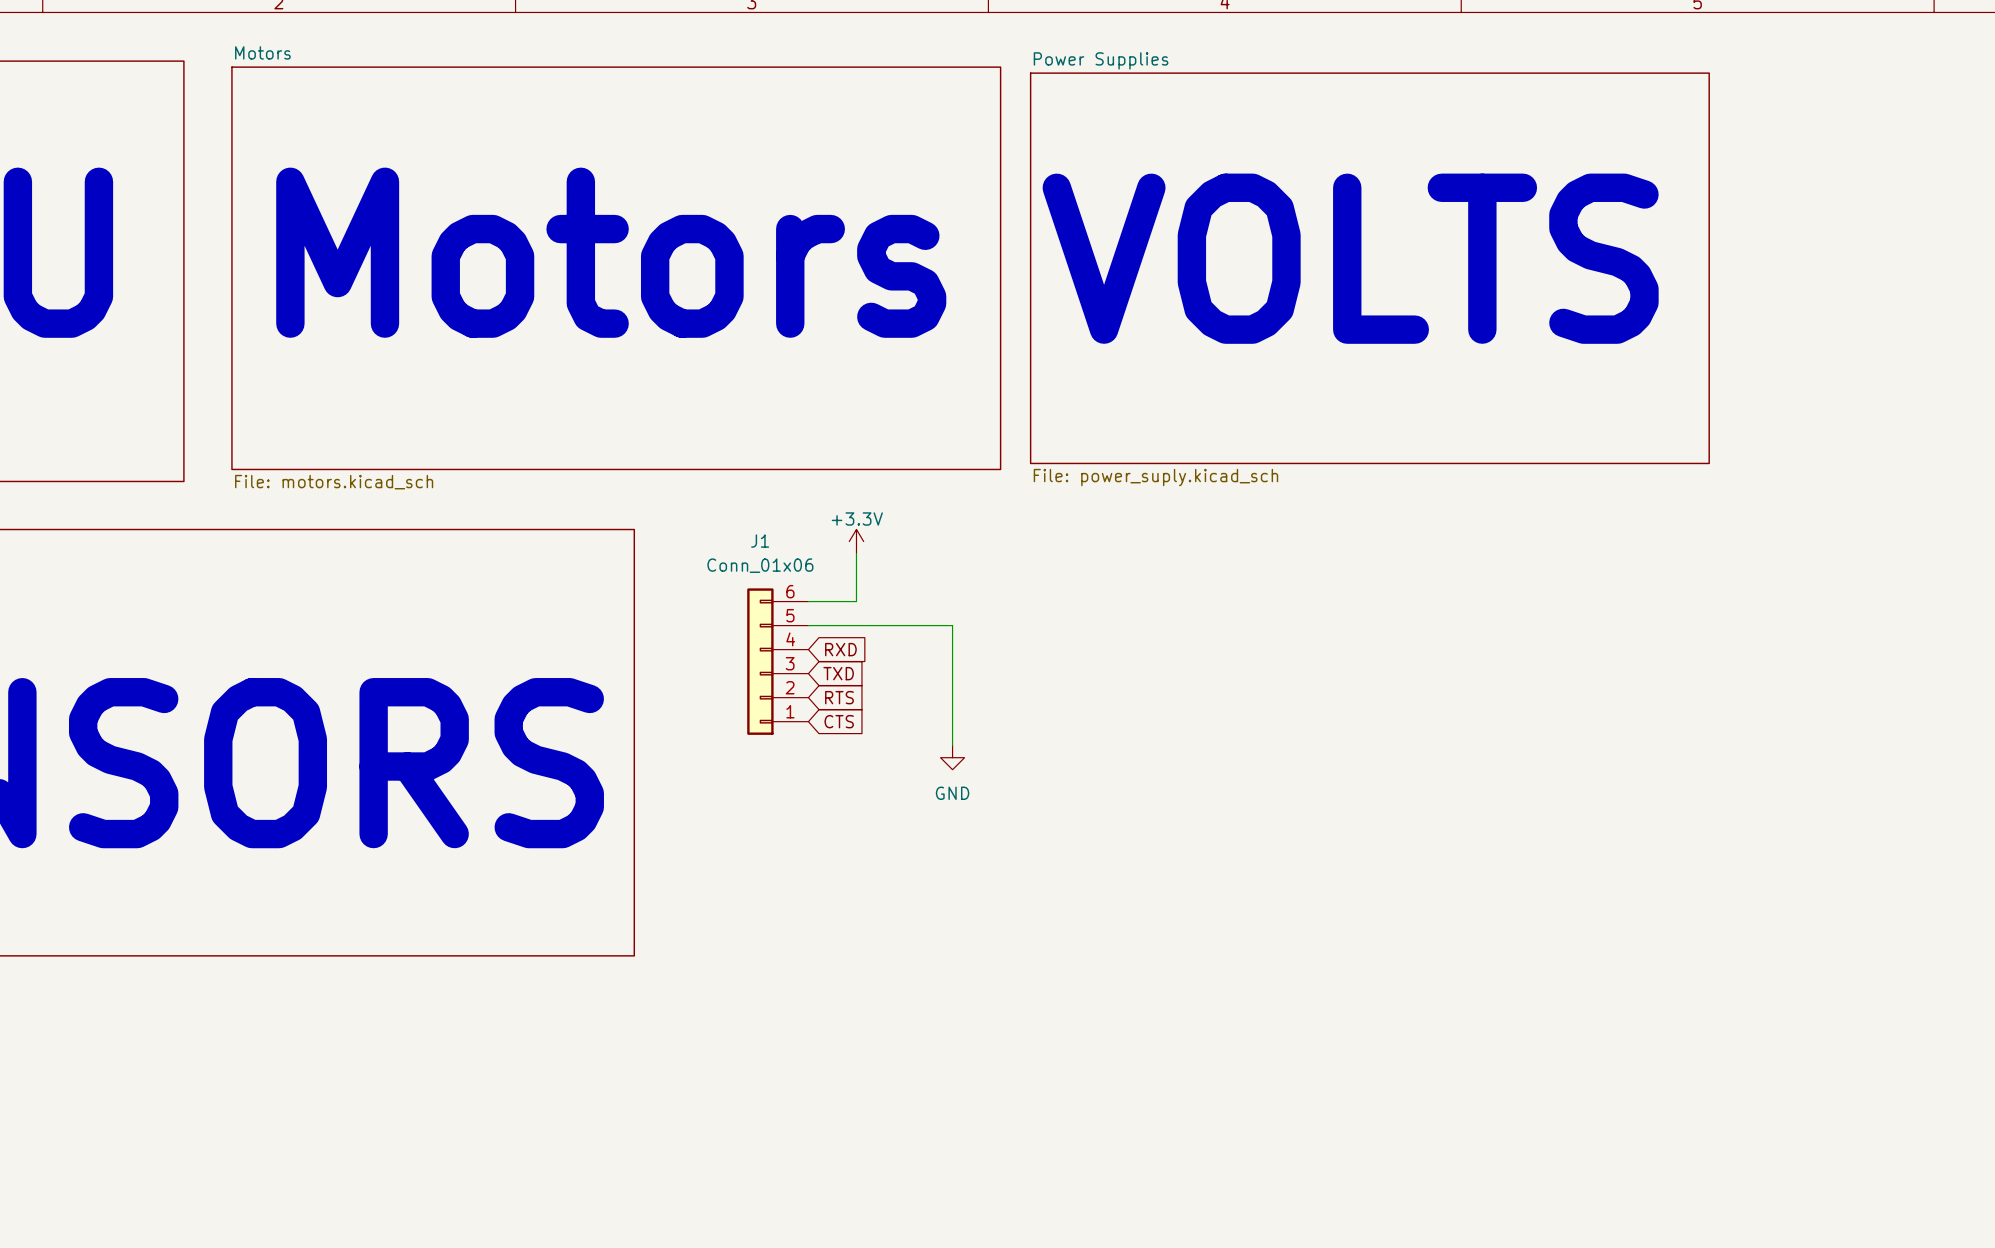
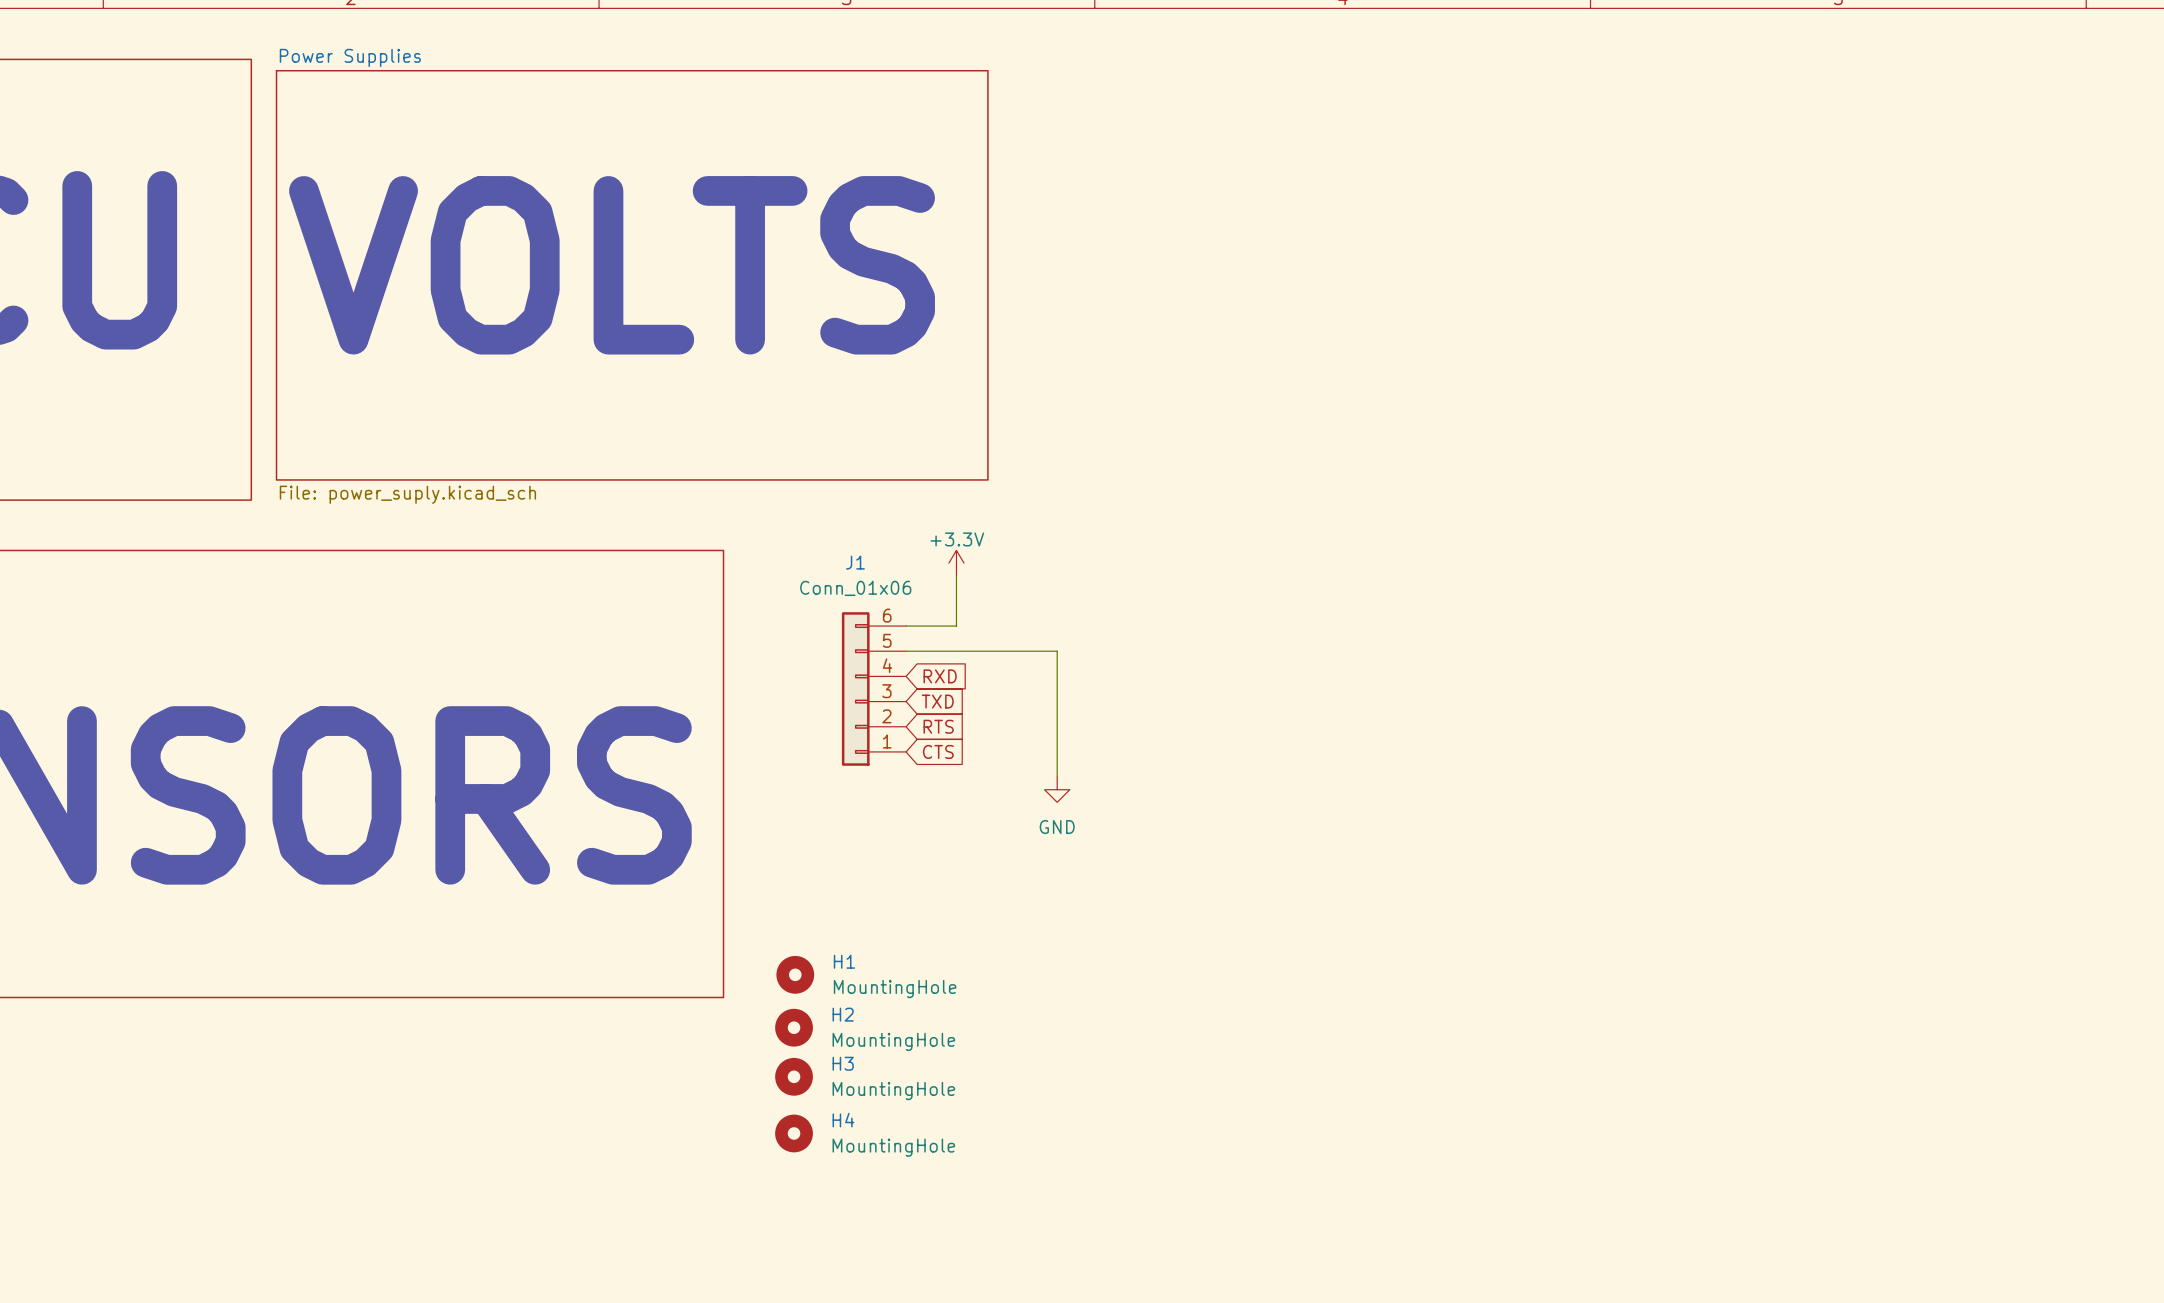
text: Motors (611, 252) -> none
text: none -> VOLTS (612, 265)
text: VOLTS (1350, 258) -> none
sheet Power Supplies: none -> File: power_suply.kicad_sch (632, 275)
sheet Motors: File: motors.kicad_sch (616, 268) -> none
sheet Power Supplies: File: power_suply.kicad_sch (1369, 268) -> none
H1: none -> MountingHole (795, 974)
H2: none -> MountingHole (794, 1027)
H3: none -> MountingHole (794, 1076)
H4: none -> MountingHole (794, 1133)

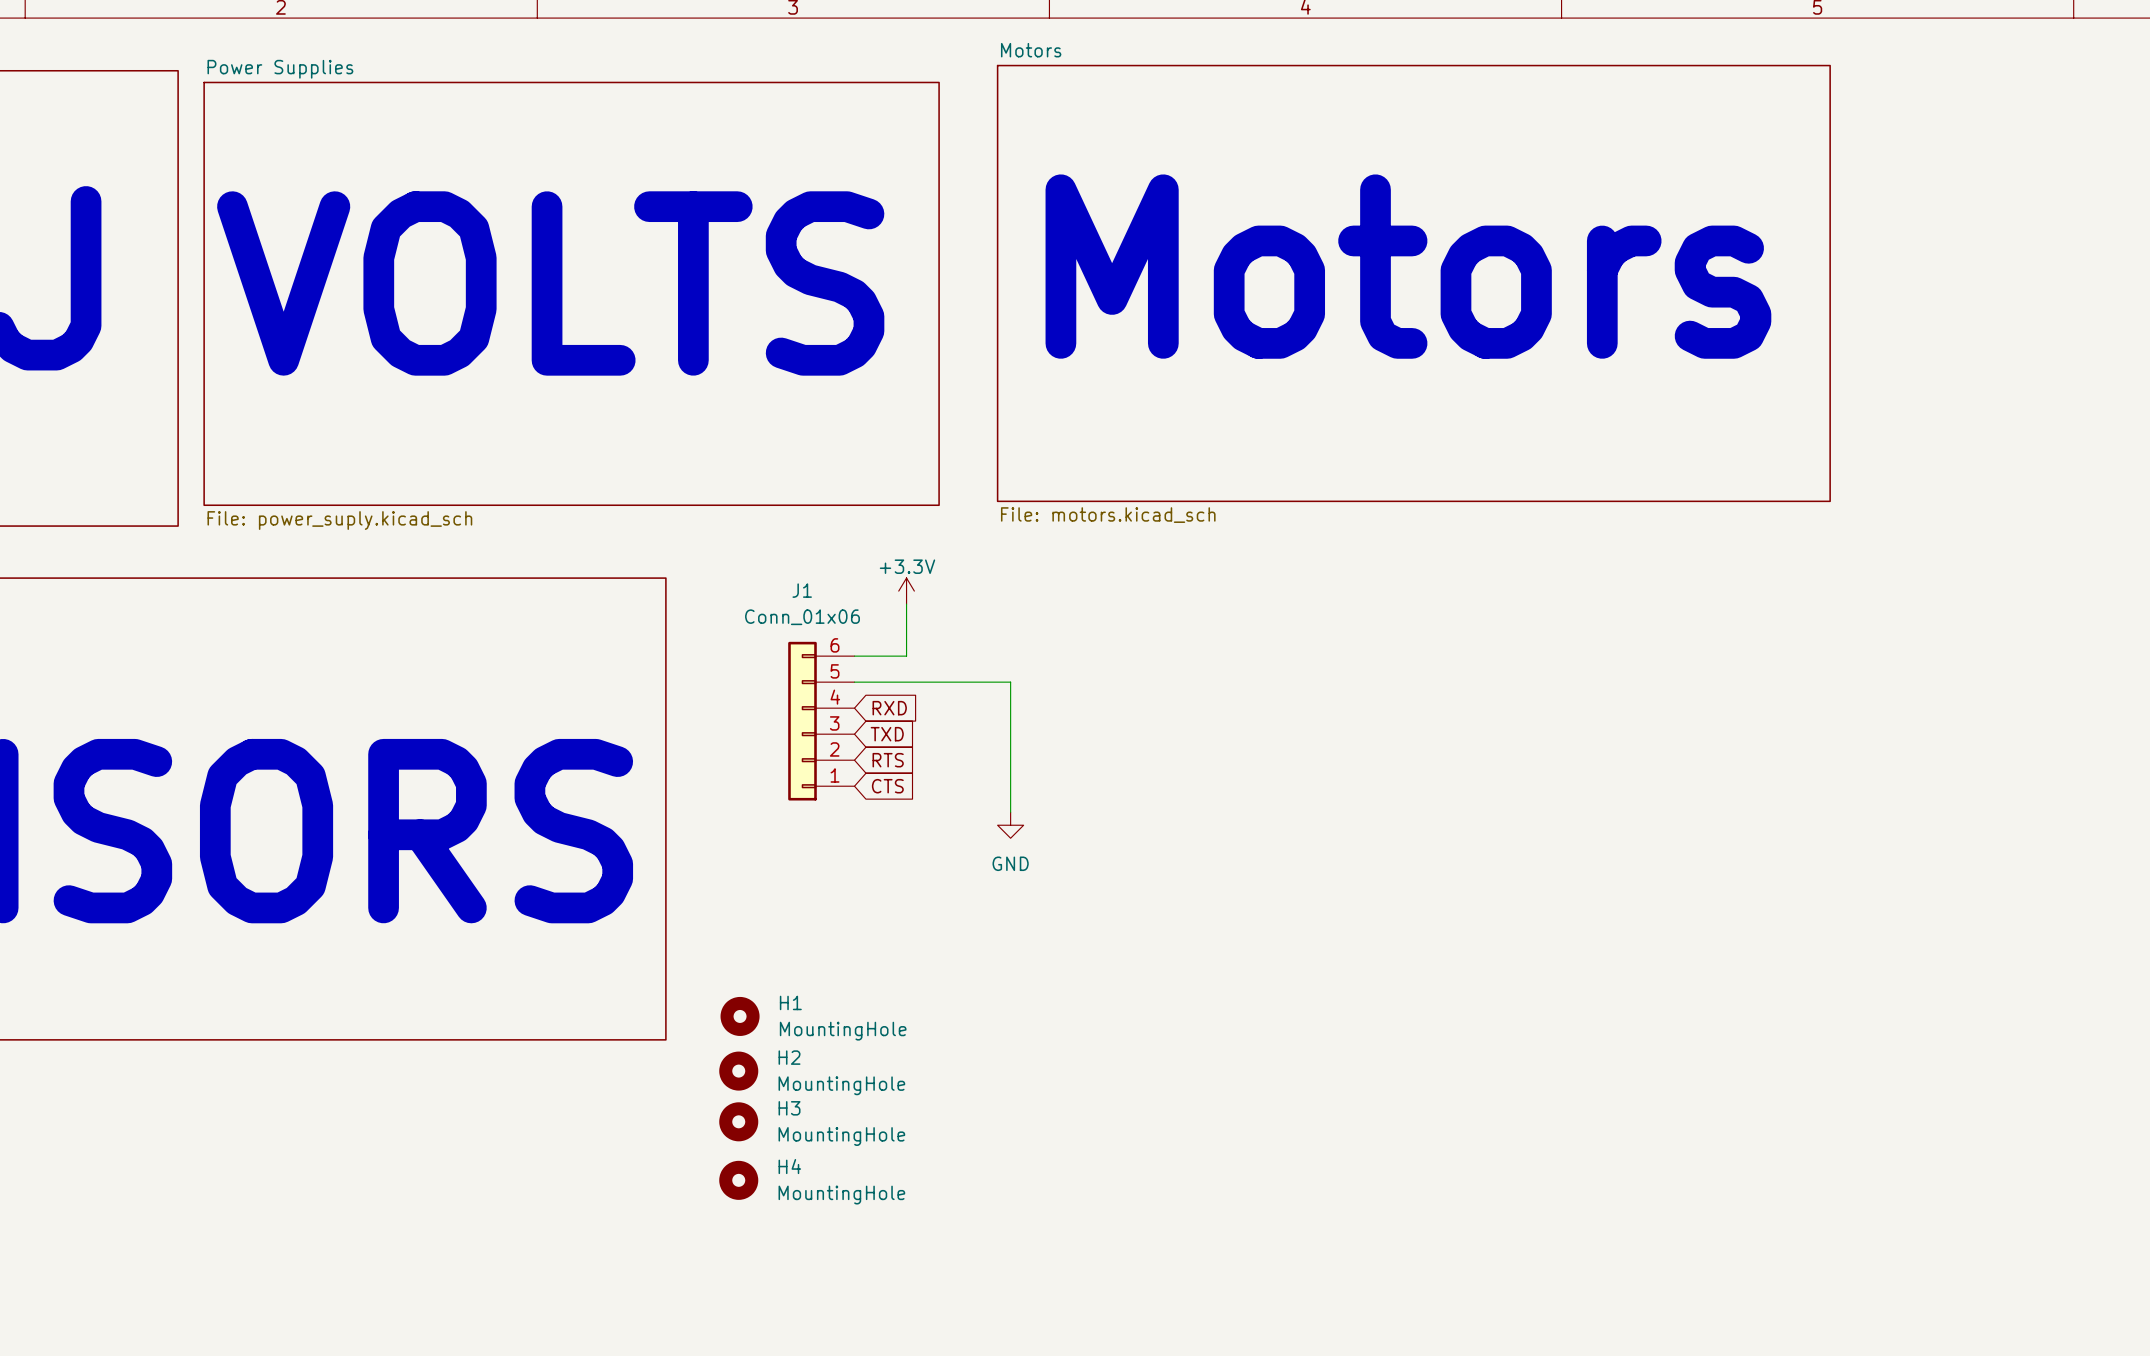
text: none -> Motors (1408, 266)
sheet Motors: none -> File: motors.kicad_sch (1413, 283)

